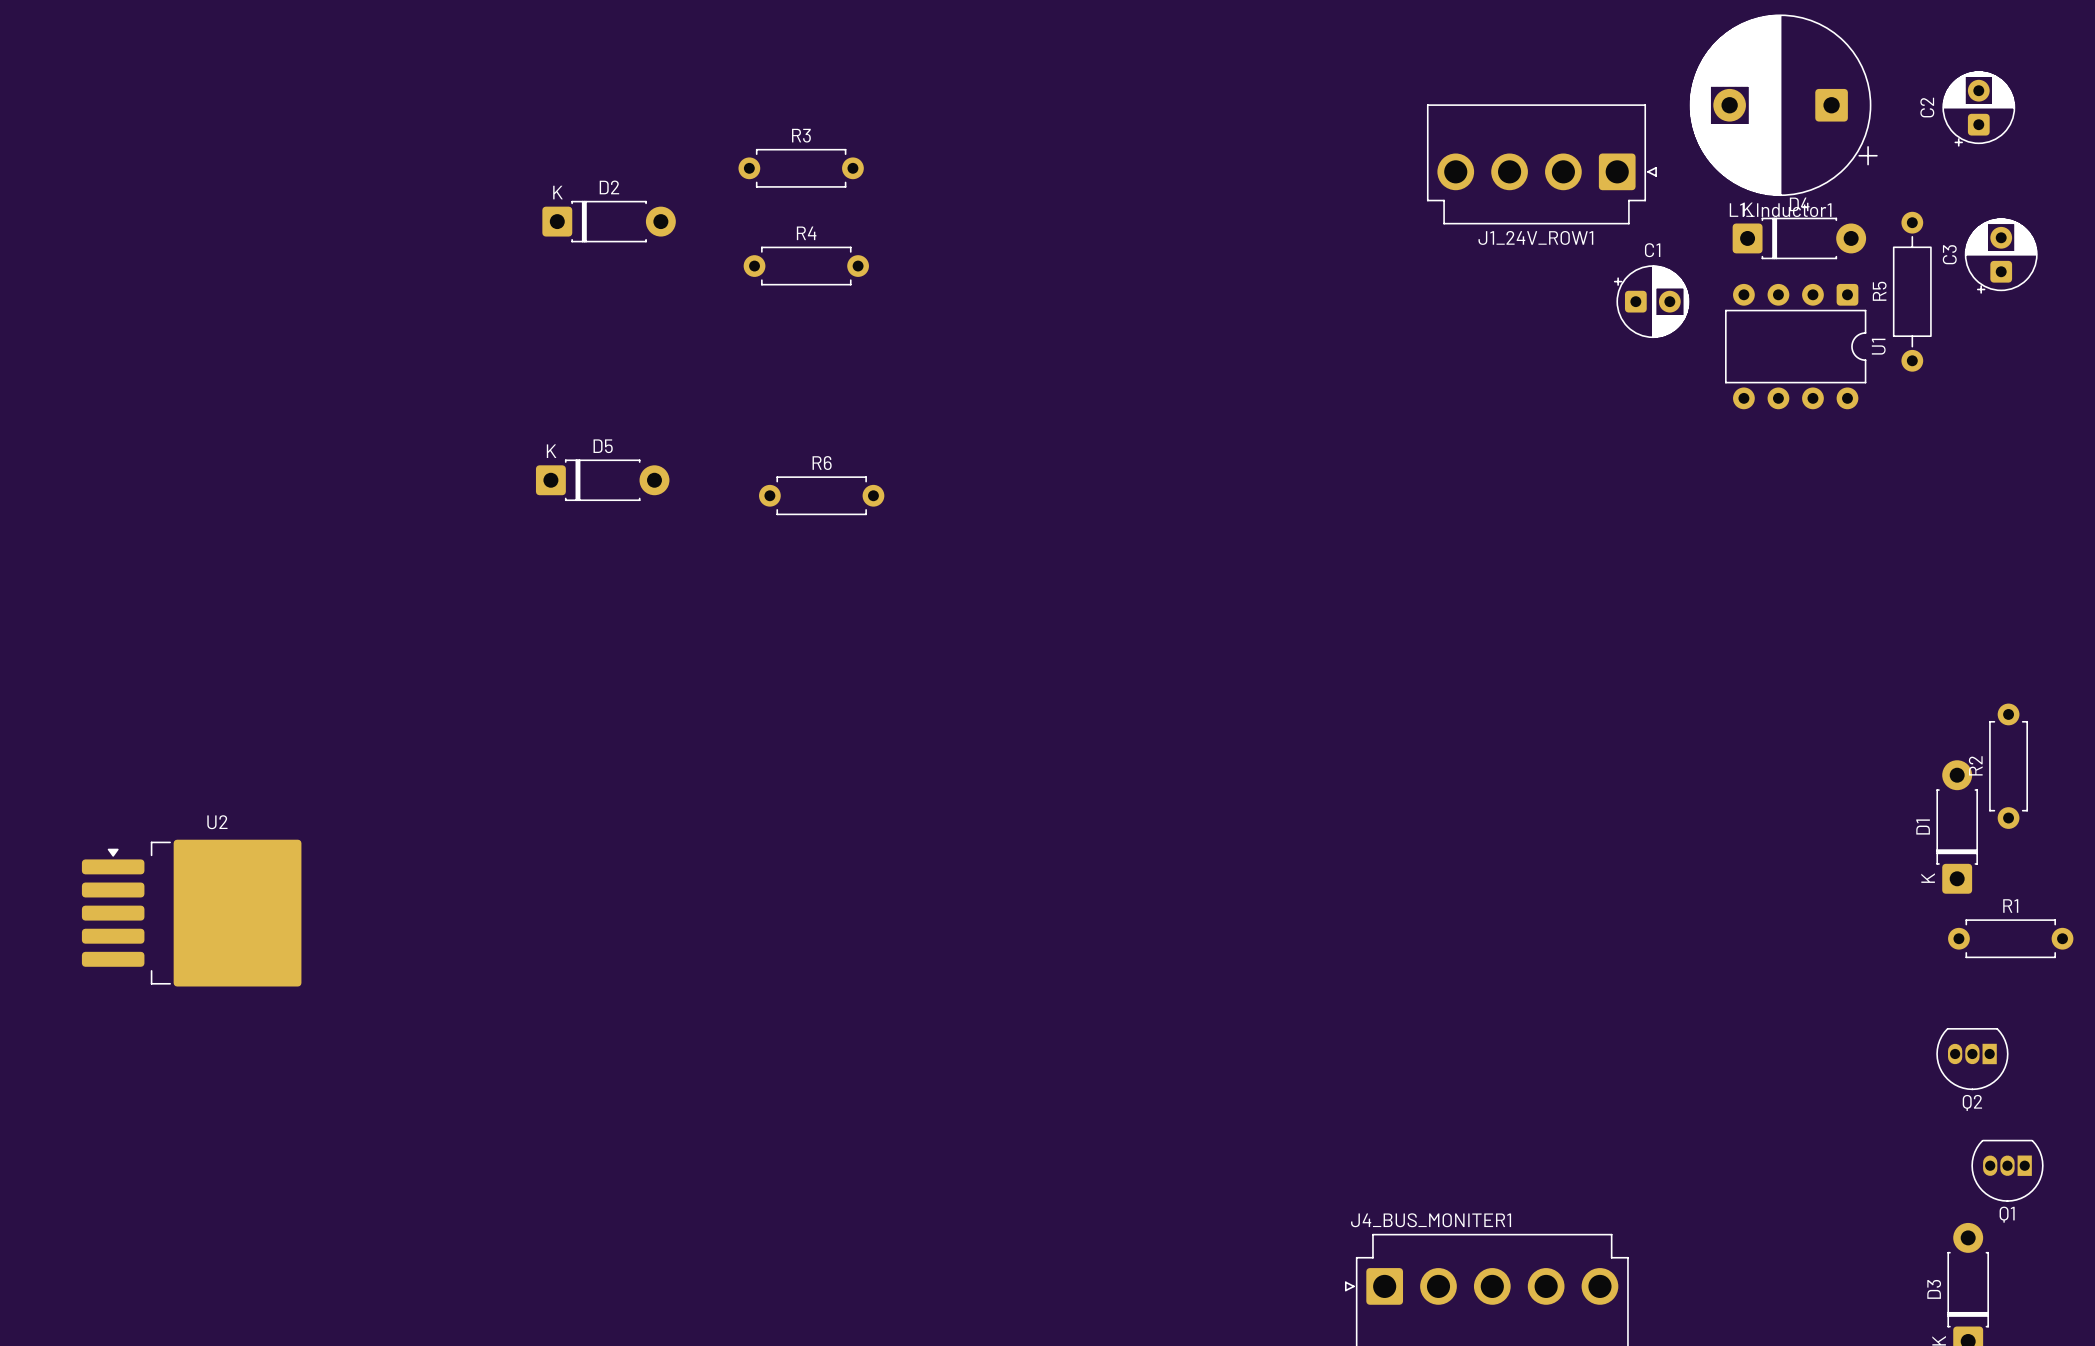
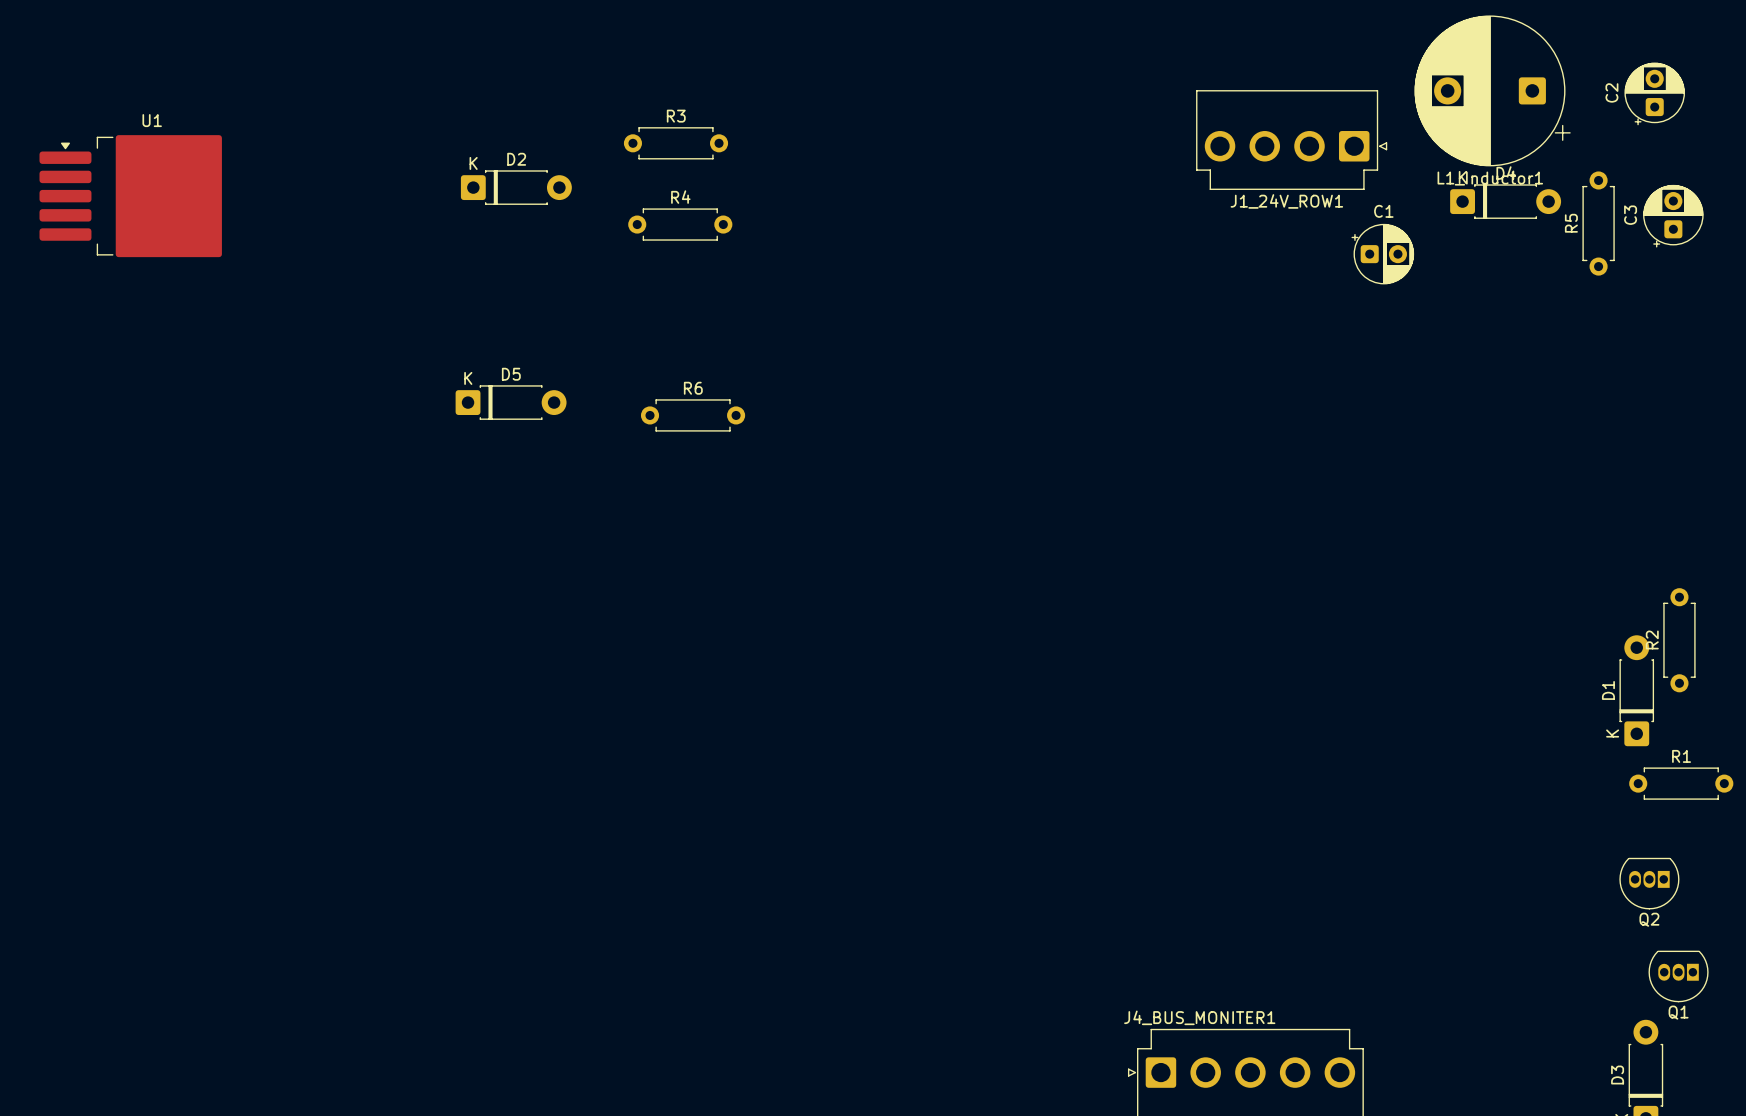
R5 footprint: [1892, 211, 1932, 372] -> [1582, 171, 1615, 276]
U1 footprint: [1725, 283, 1867, 410] -> [39, 135, 222, 258]
U1 name position: U1 (1878, 346) -> U1 (152, 120)
U2: (191, 913) -> none

